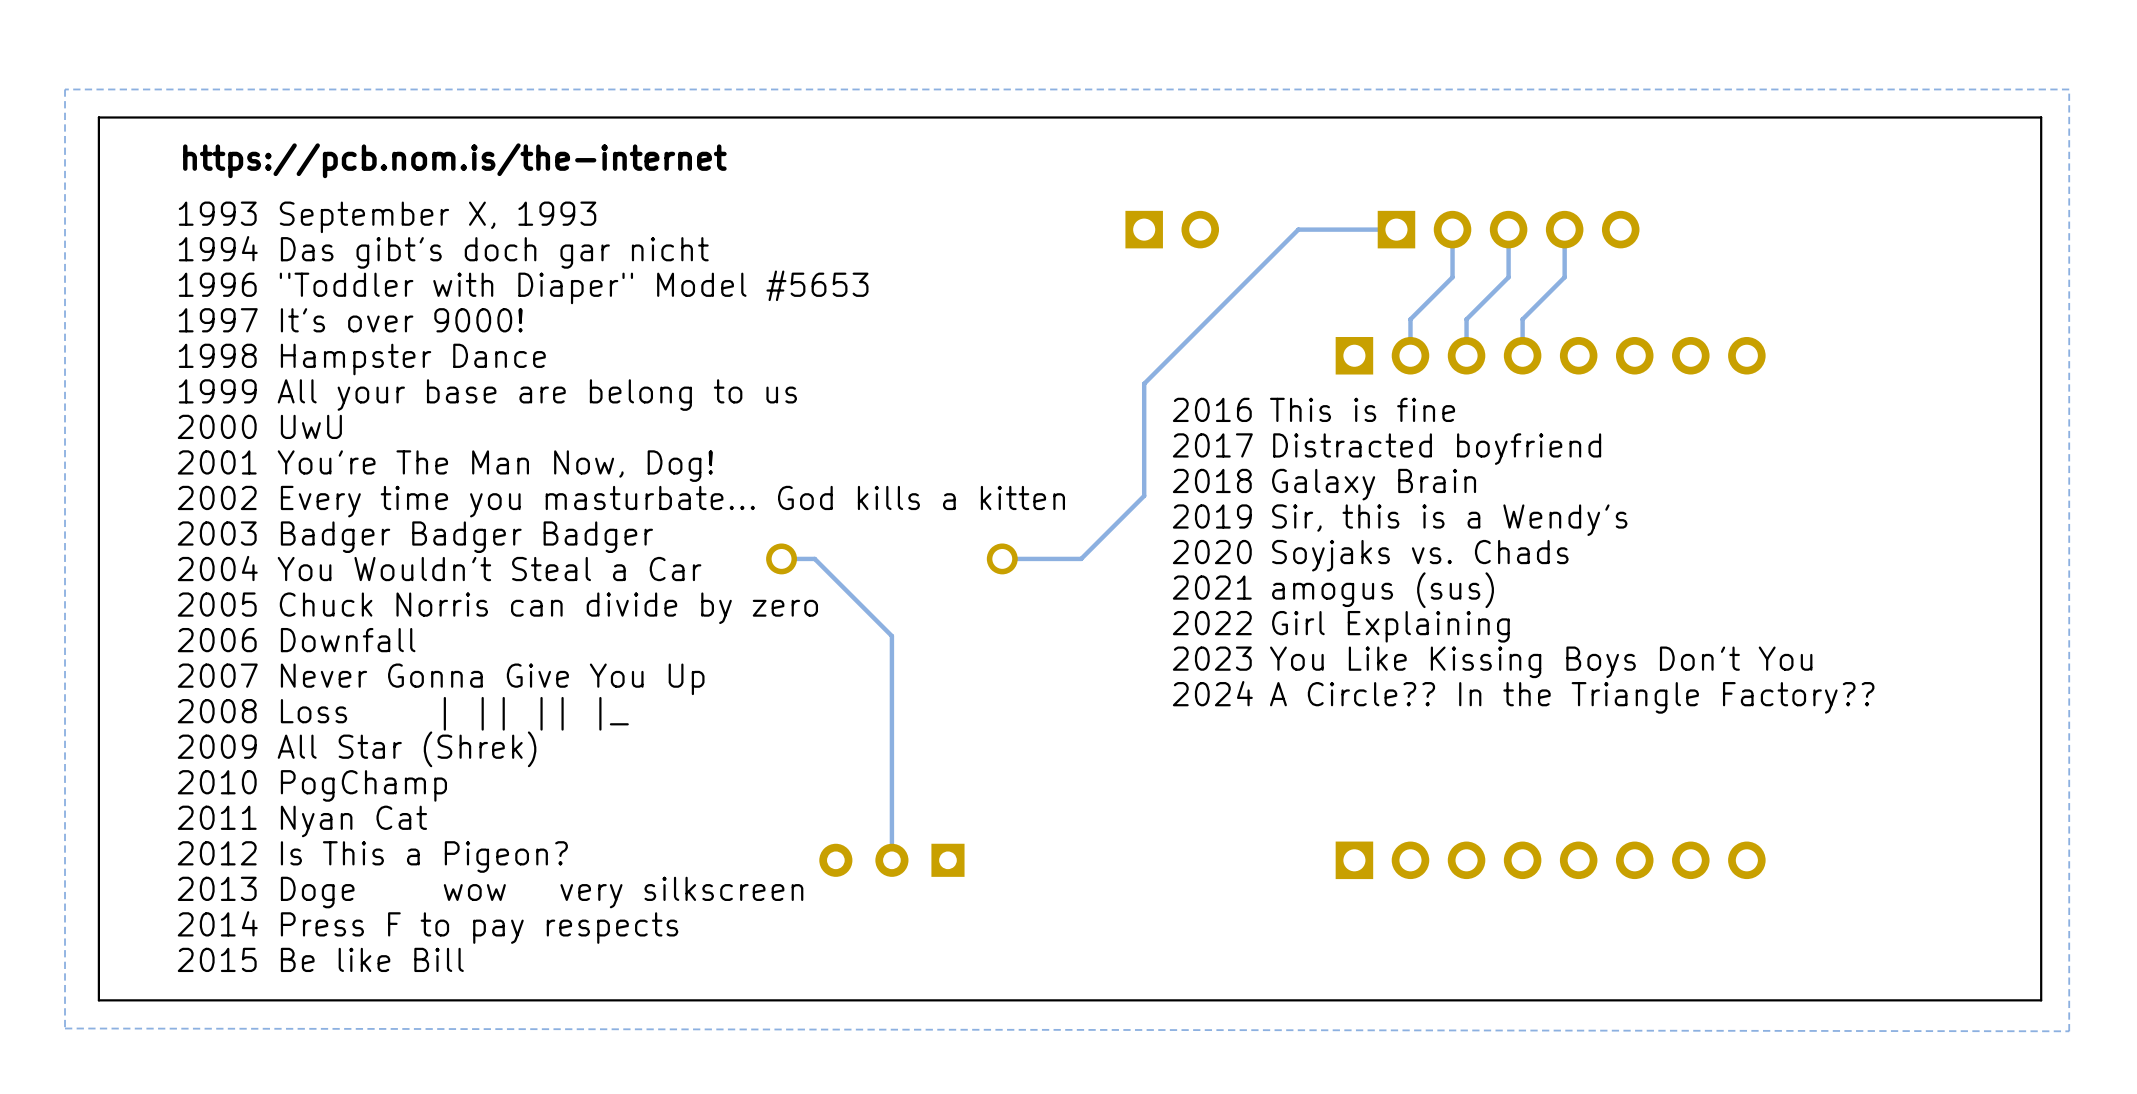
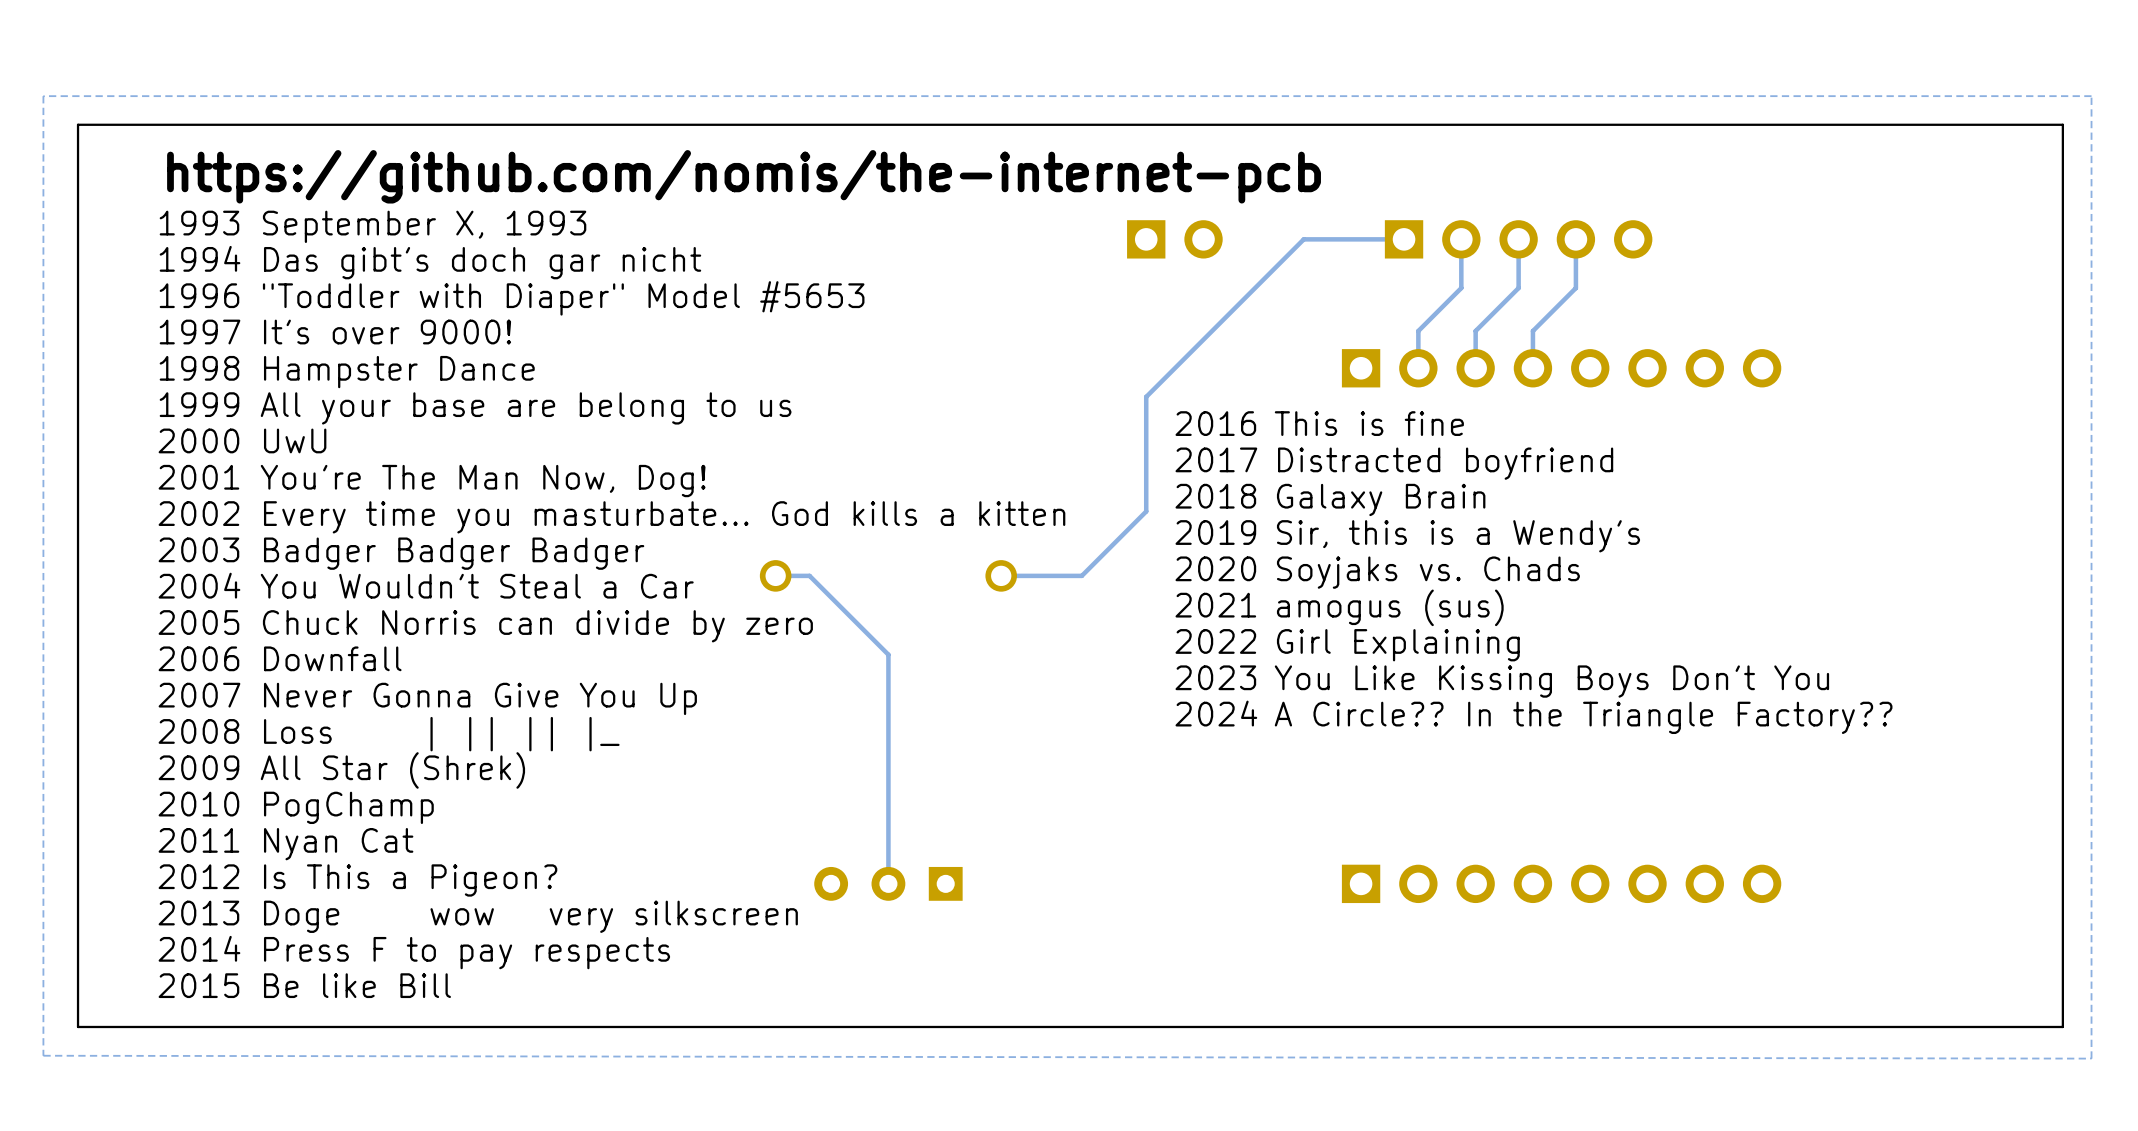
text: https://pcb.nom.is/the-internet (454, 160) -> https://github.com/nomis/the-internet-pcb (744, 176)

